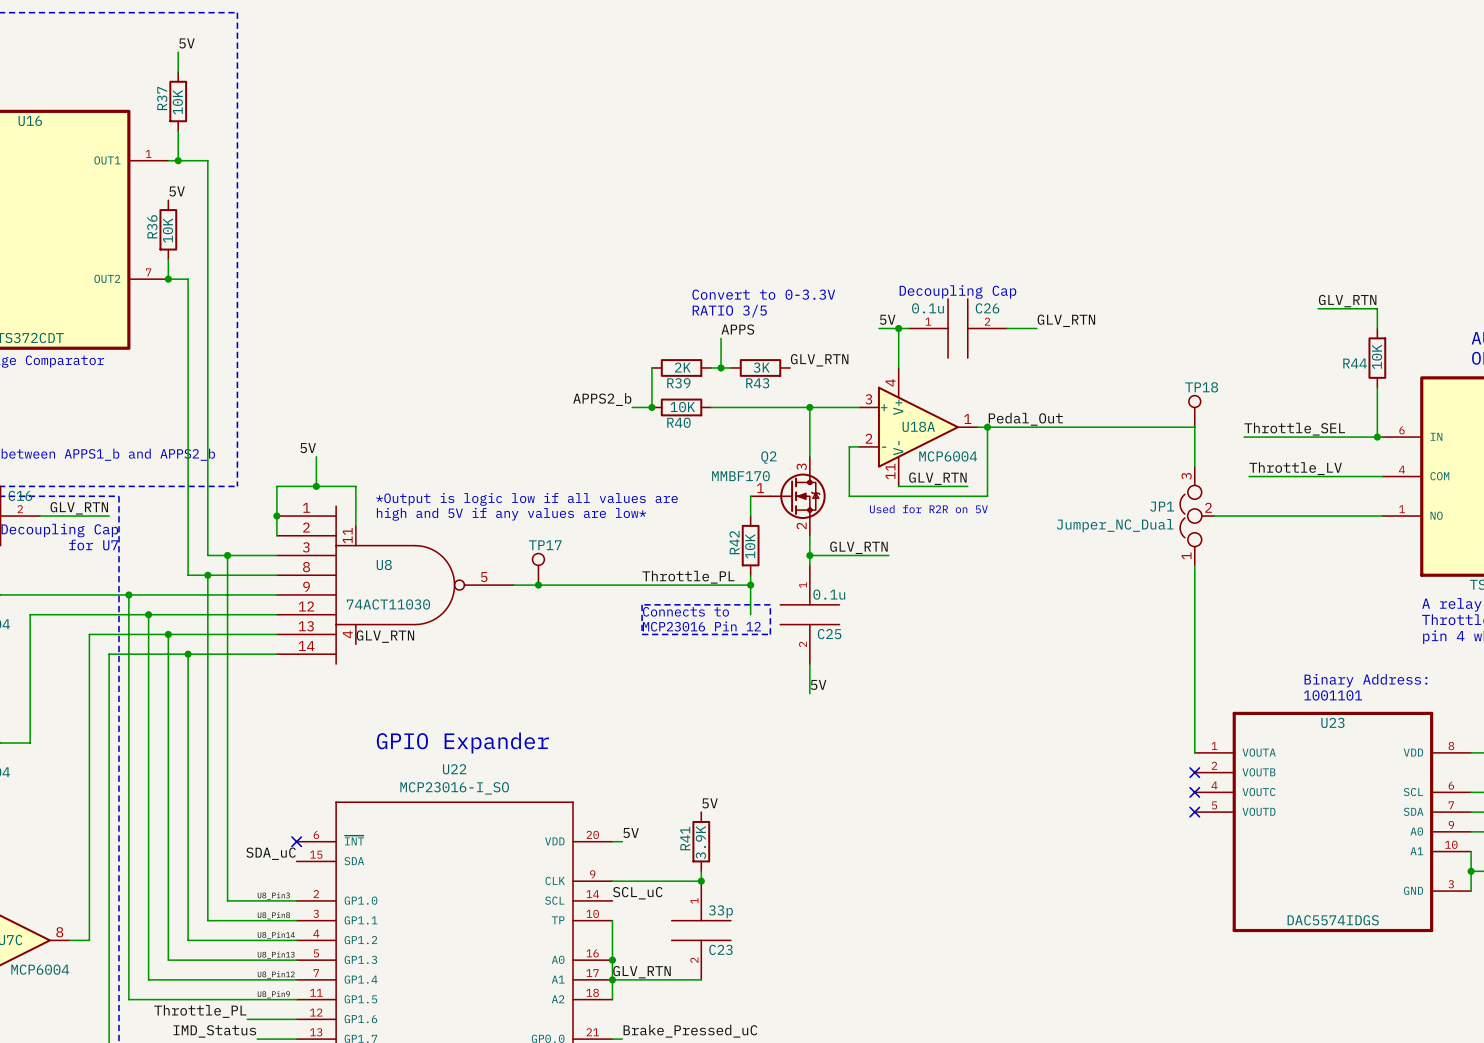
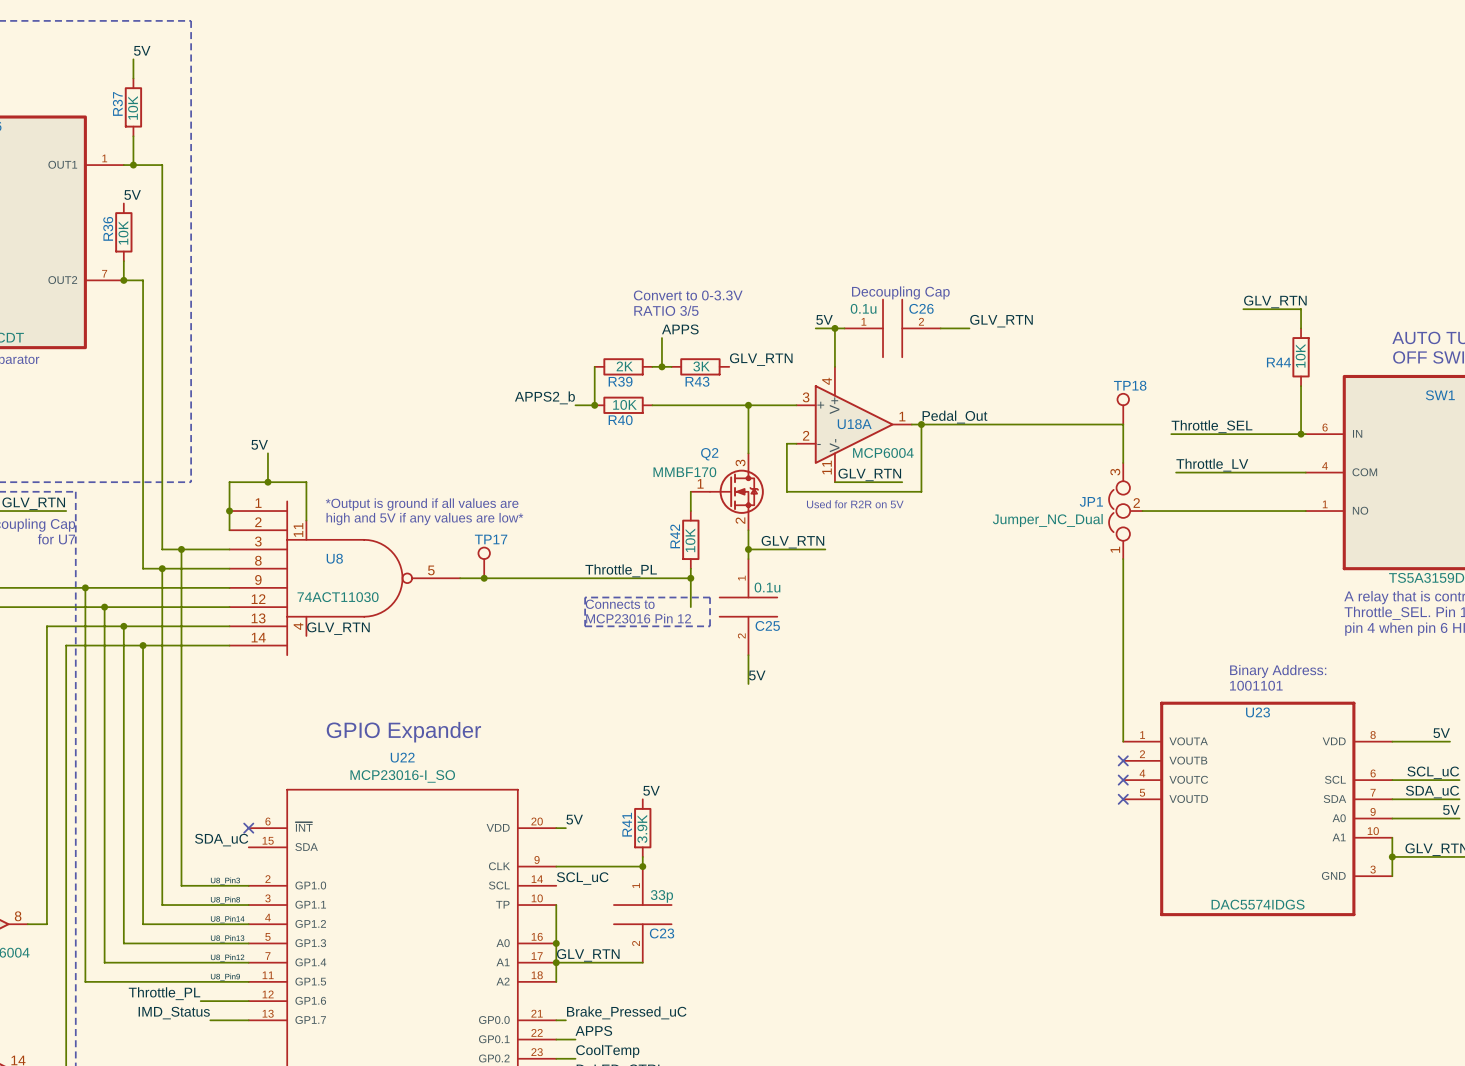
text: *Output is logic low if all values are (526, 499) -> *Output is ground if all values are (422, 504)
text position: high and 5V if any values are low* (511, 514) -> high and 5V if any values are low* (424, 519)

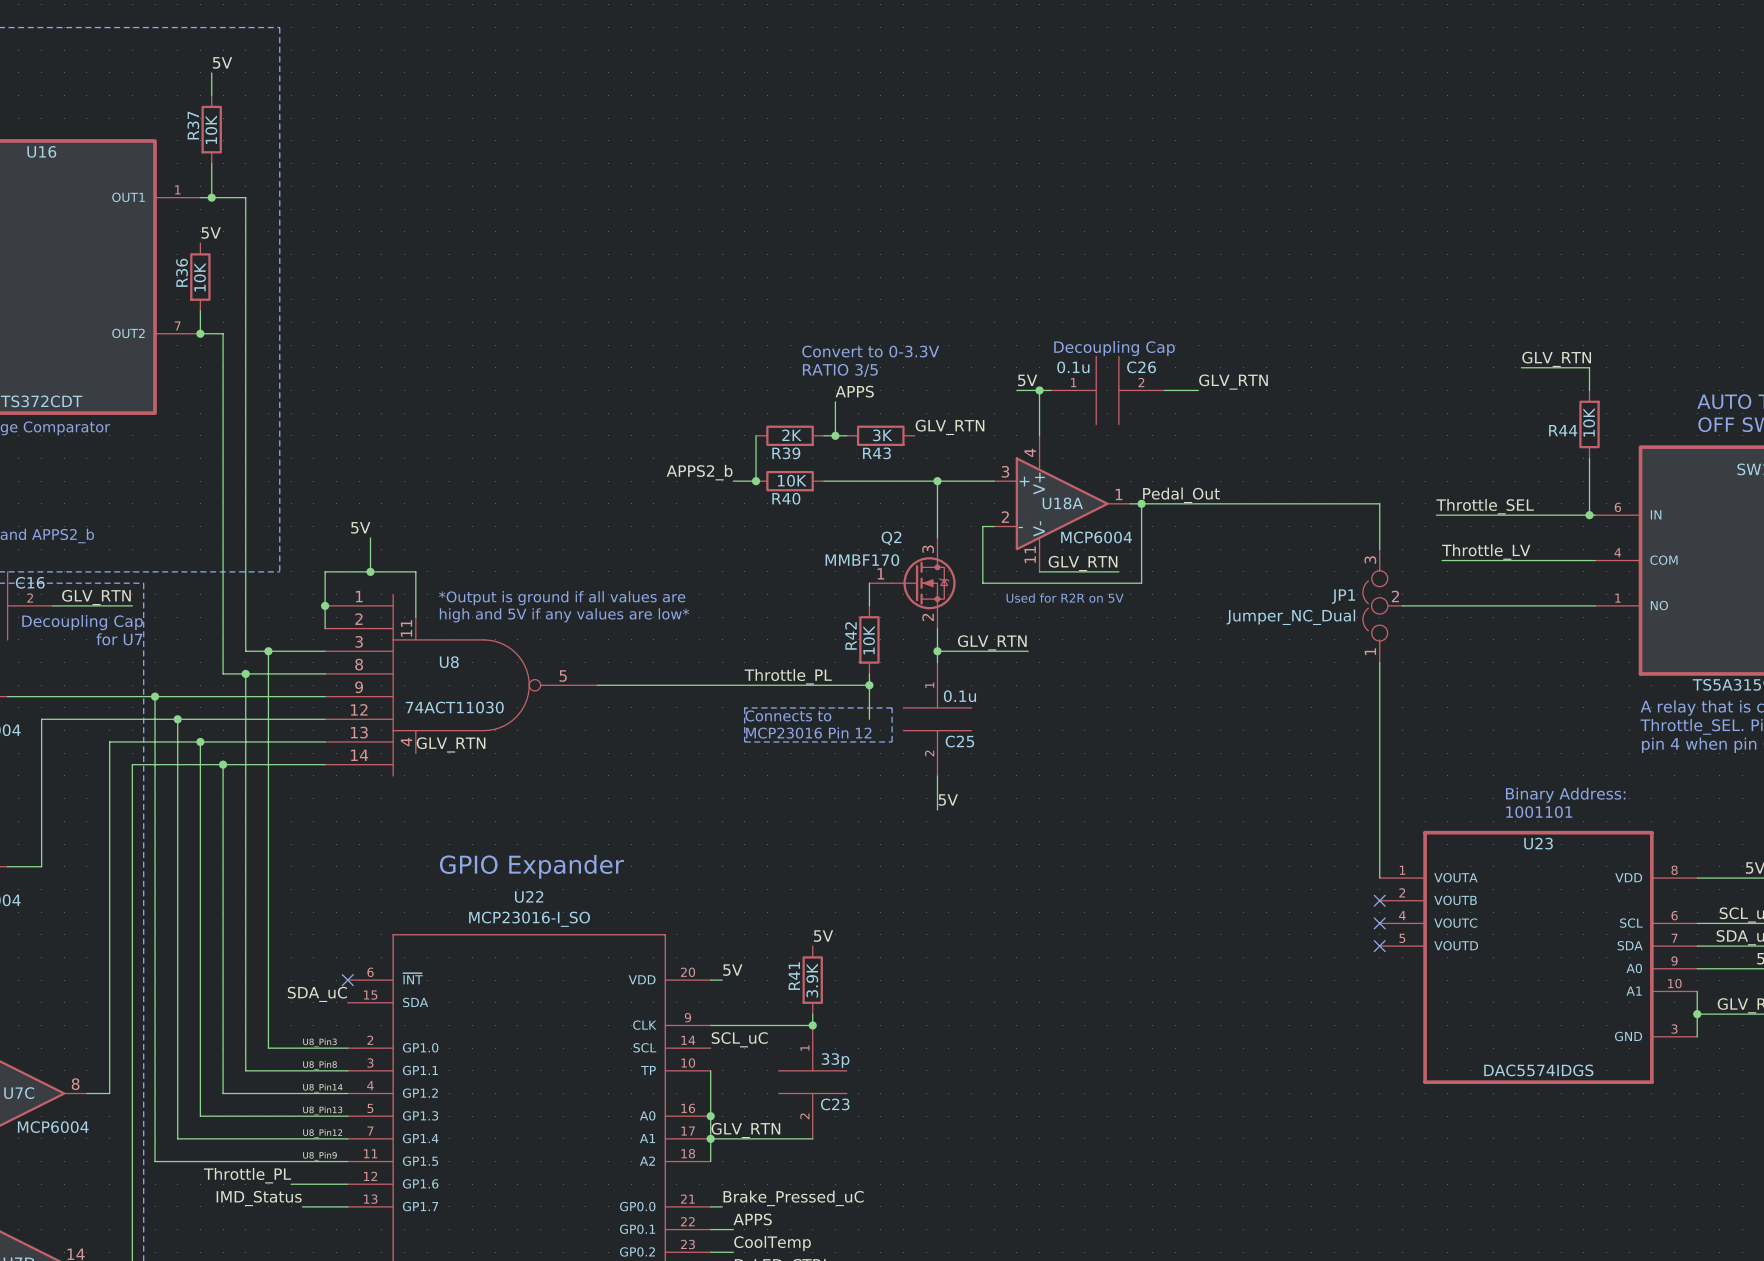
TP18: (1123, 409) -> none
TP17: (484, 562) -> none
junction: (484, 578) -> none

